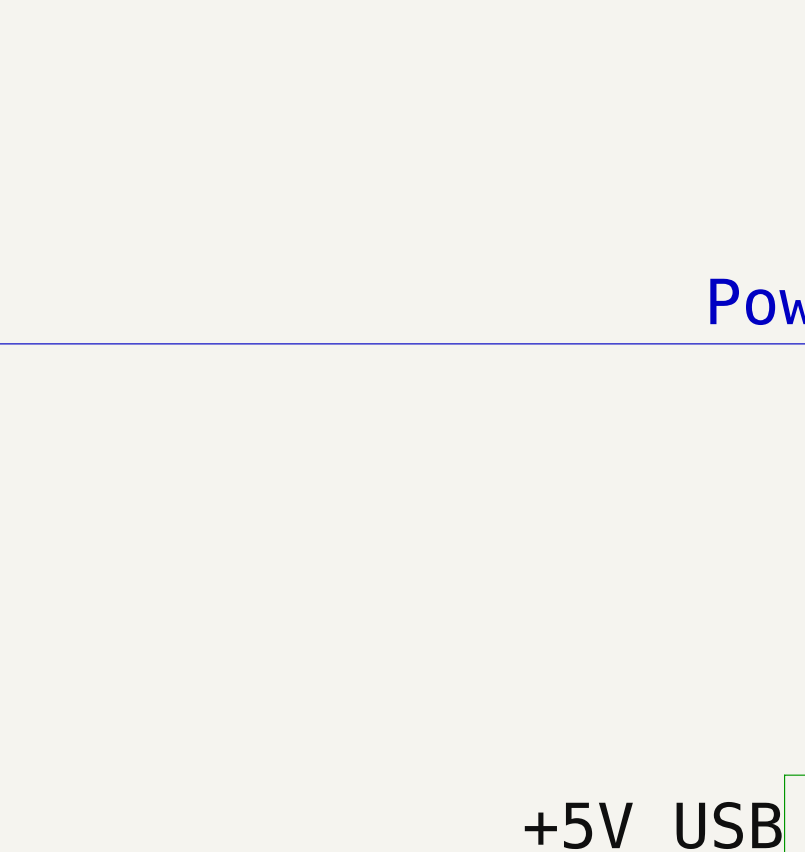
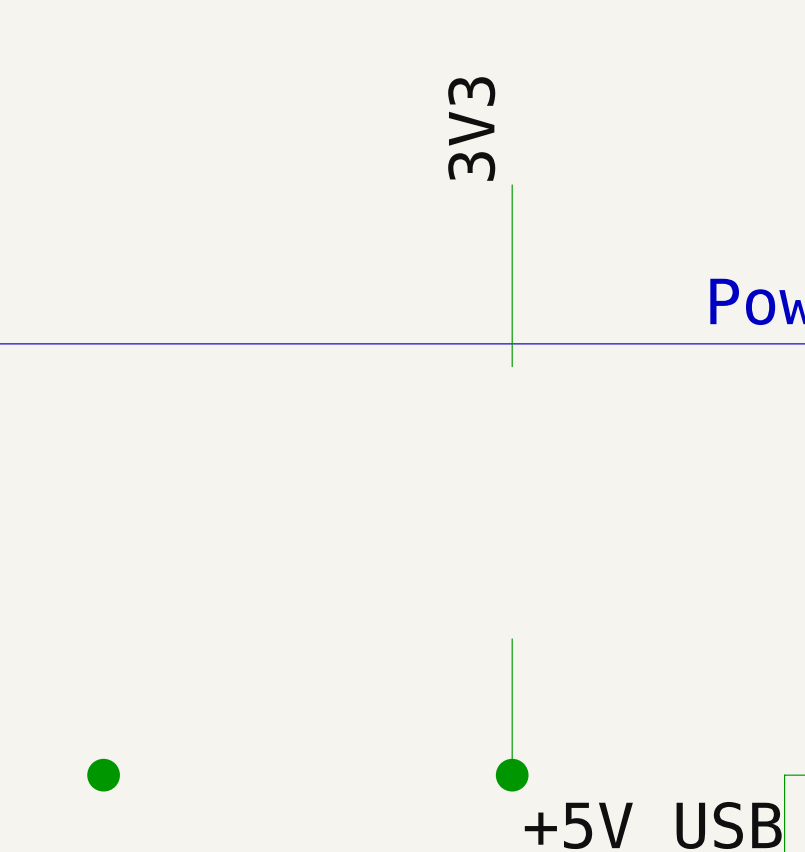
label: none -> 3V3 (471, 129)
wire: none -> (512, 184) (512, 366)
wire: none -> (512, 638) (512, 775)
junction: none -> (103, 775)
junction: none -> (512, 775)

